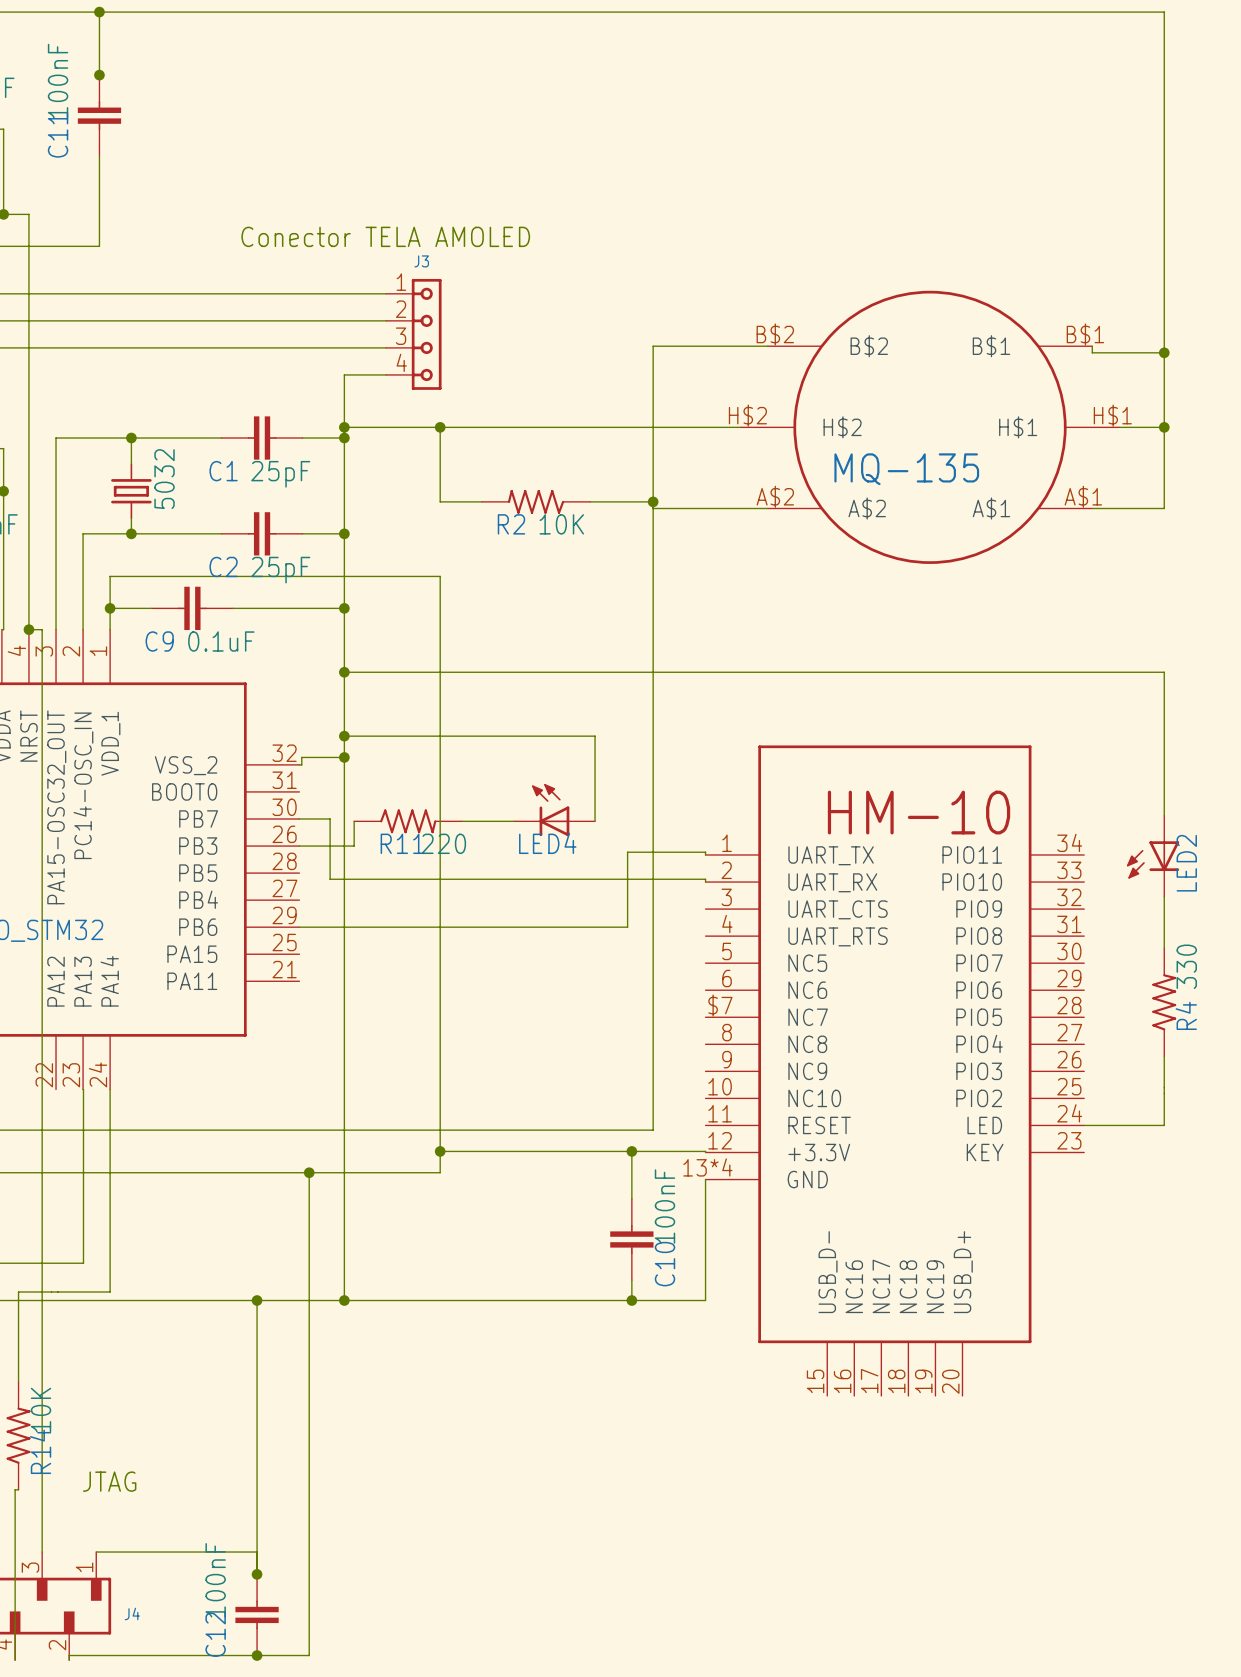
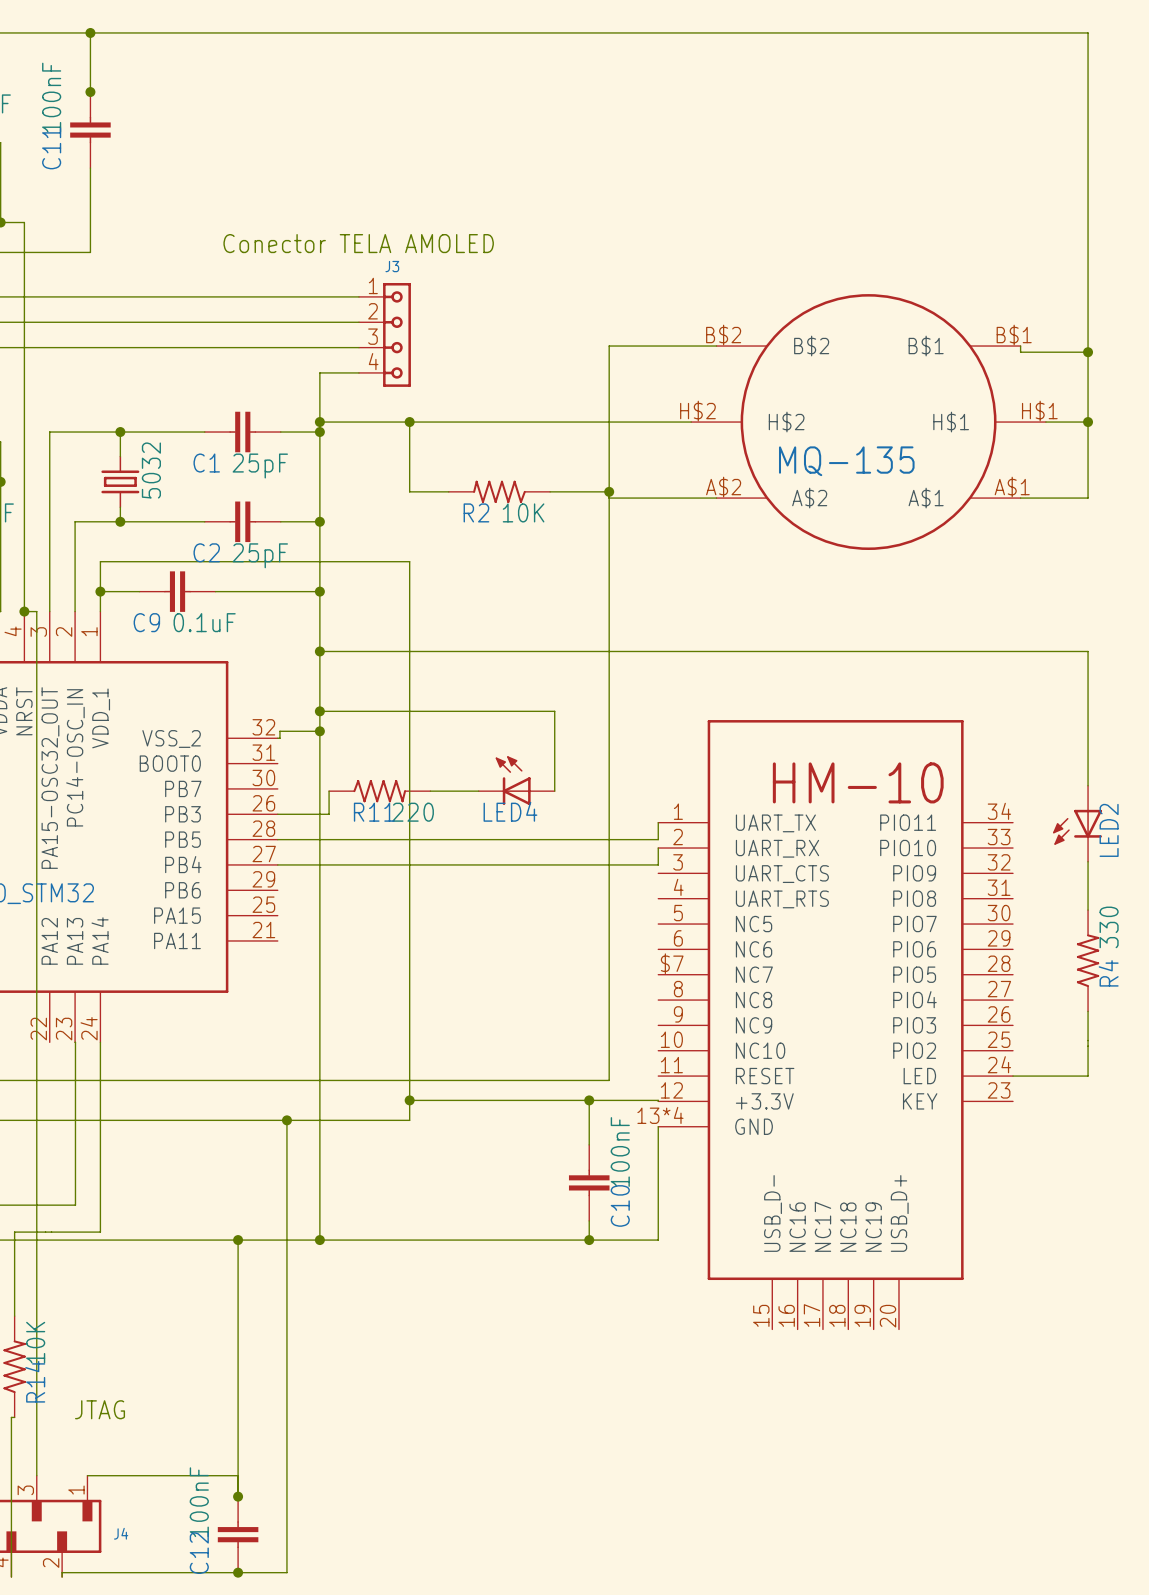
wire: (299, 818) (330, 818) (330, 879) (705, 879) (705, 882) -> (277, 864) (658, 864) (658, 848)
wire: (705, 854) (705, 852) (627, 852) (627, 927) (299, 927) -> (658, 822) (658, 839) (277, 839)

